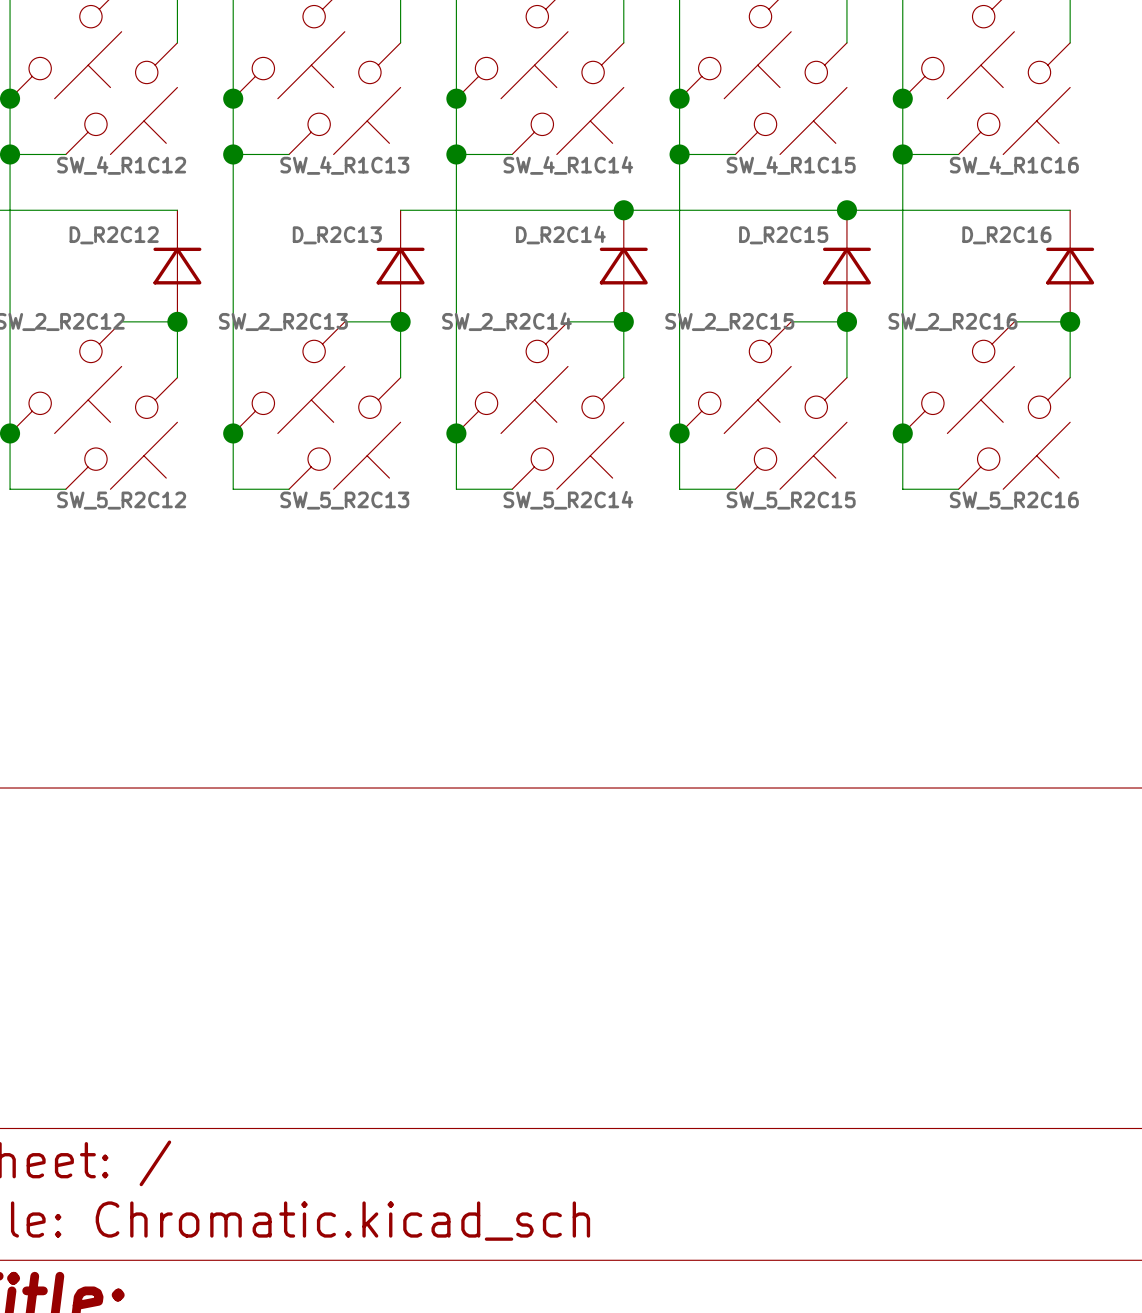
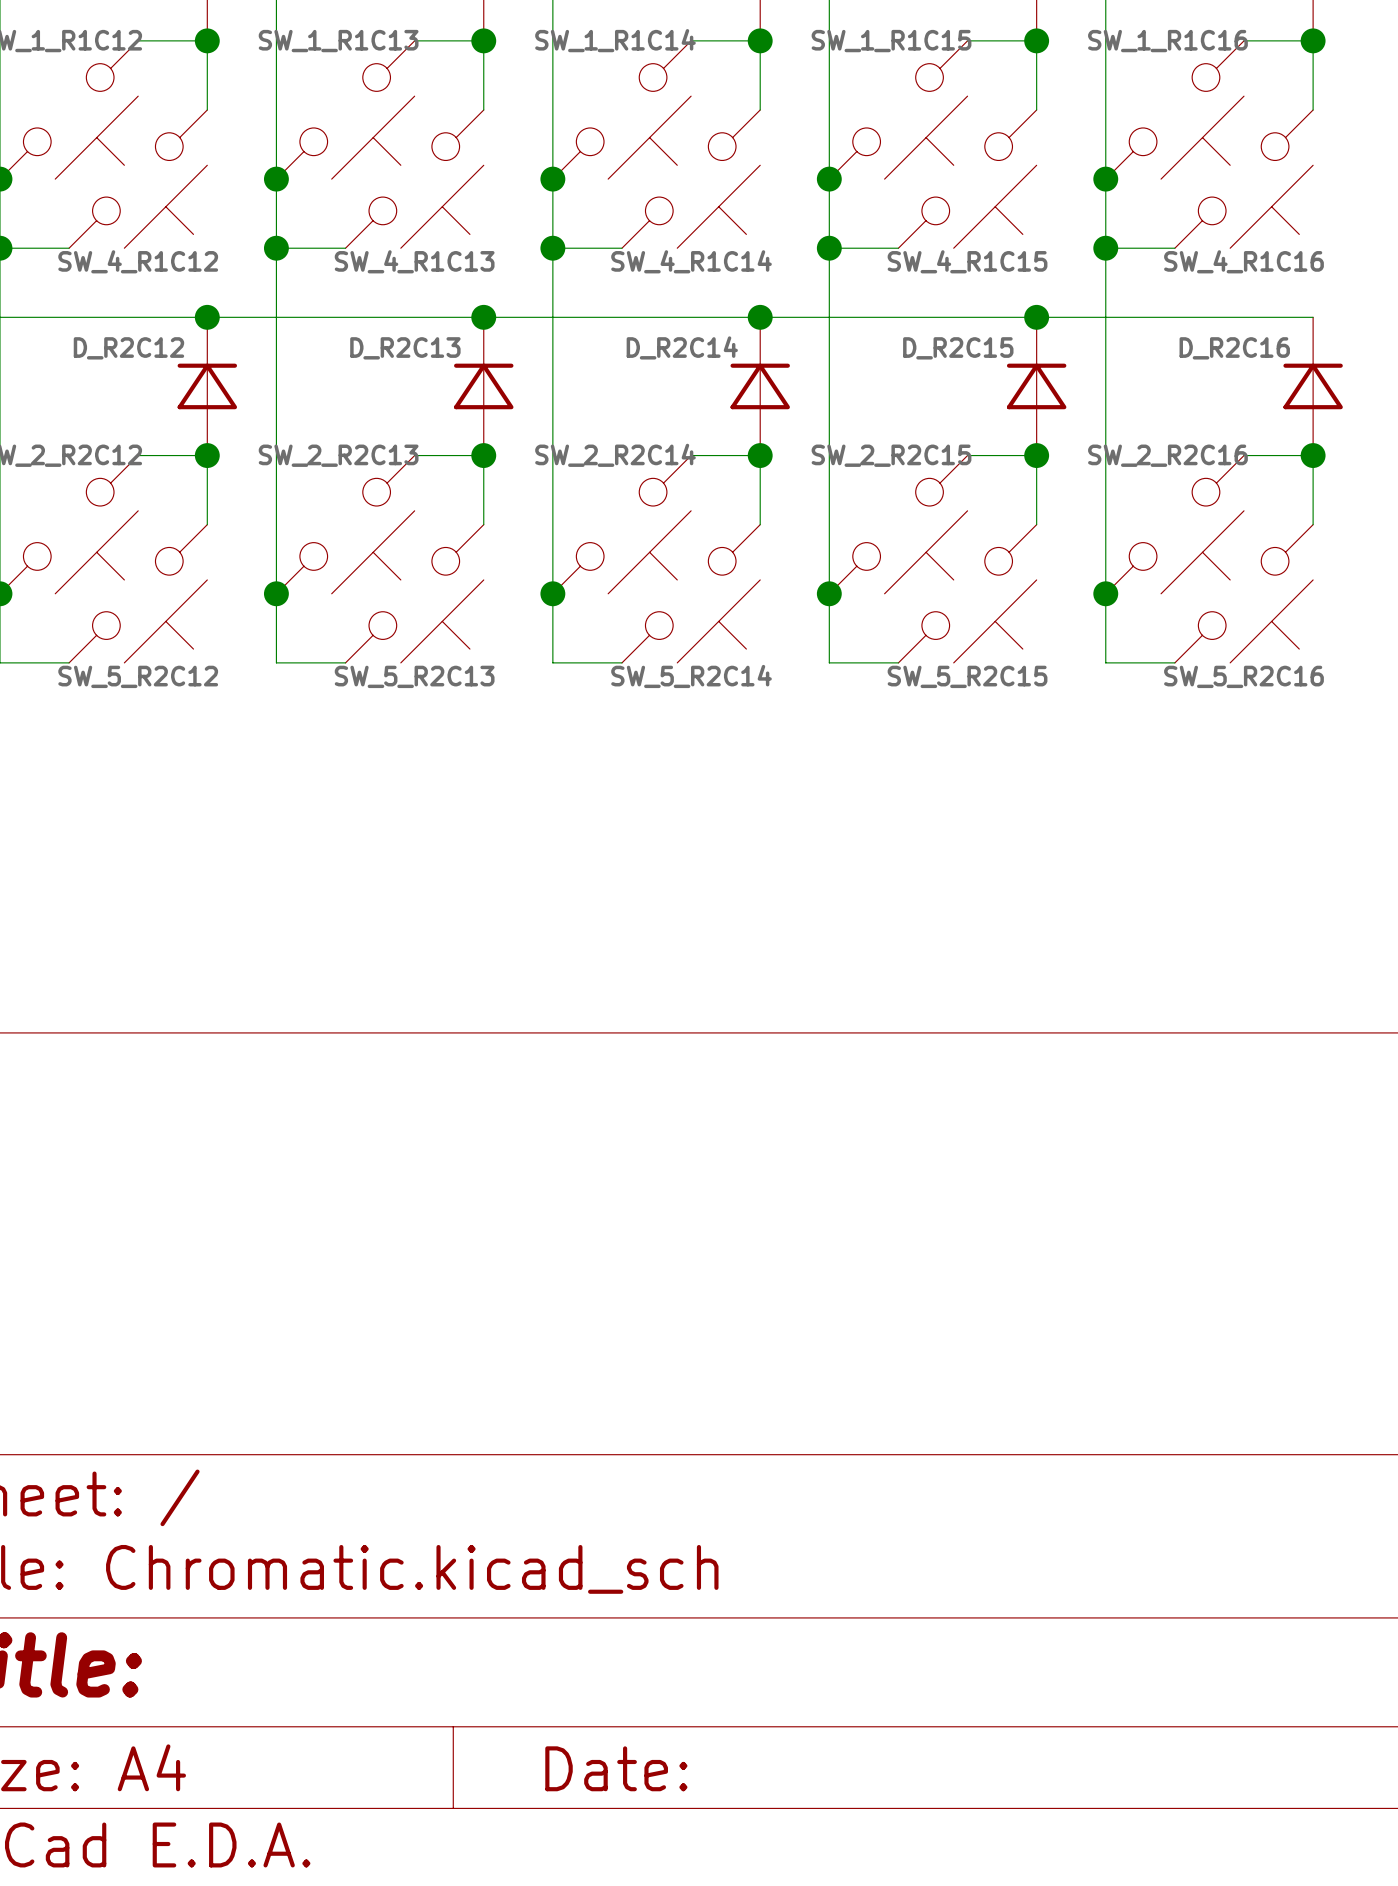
wire: none -> (207, 317) (483, 317)
junction: none -> (207, 317)
junction: none -> (483, 317)

